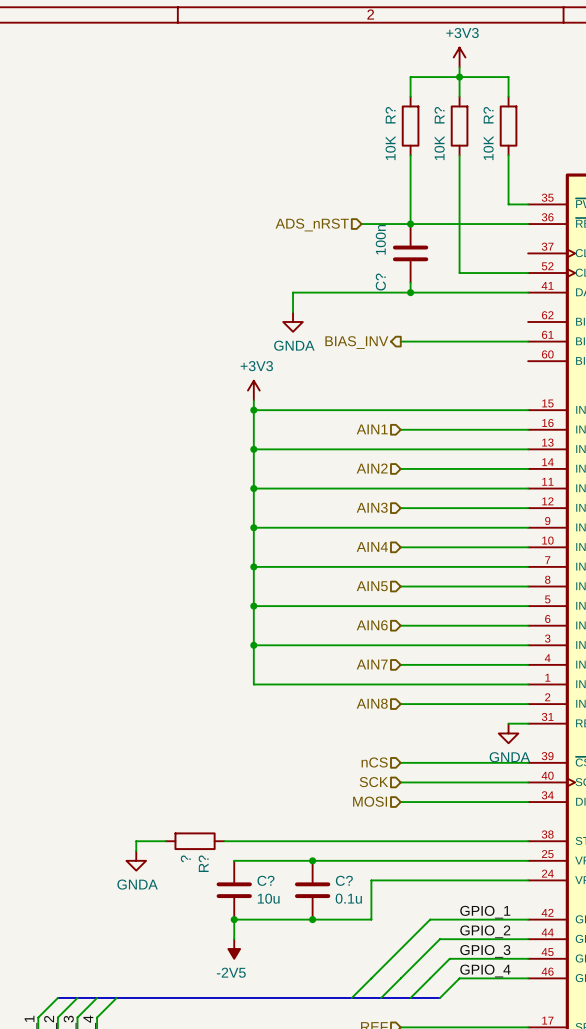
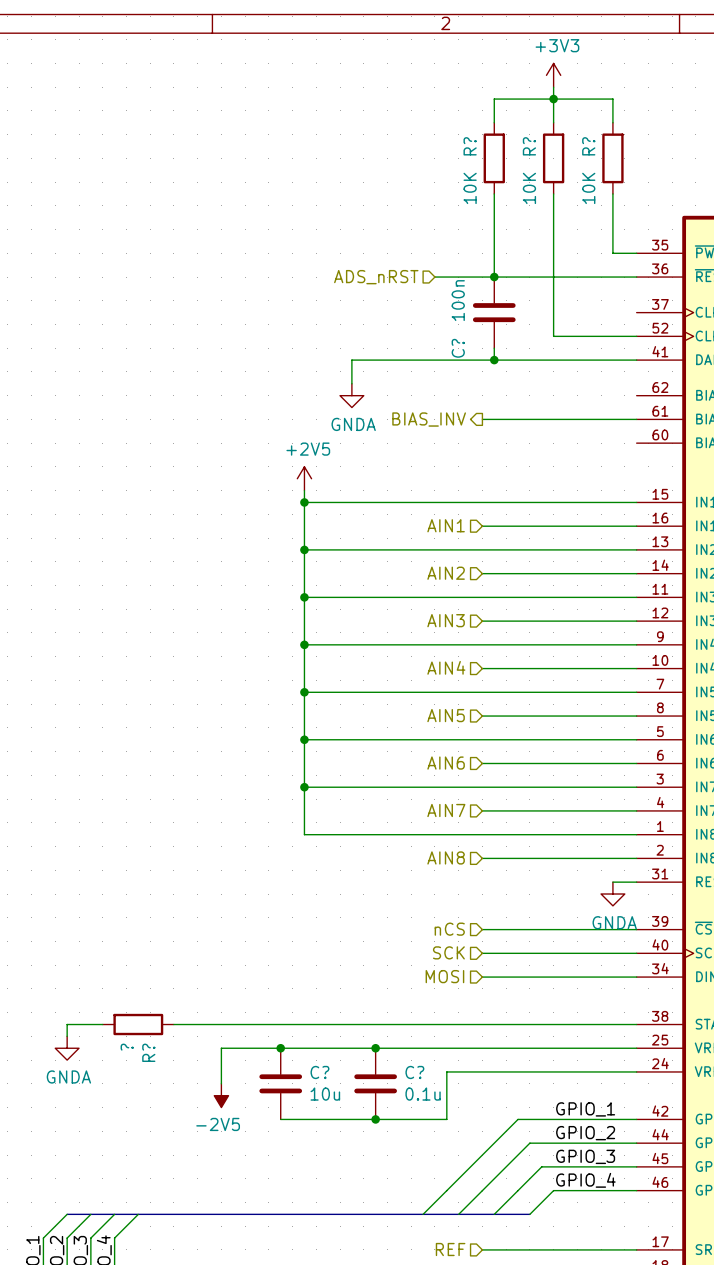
power symbol: +3V3 (253, 390) -> +2V5 (304, 478)
wire: none -> (102, 1024) (67, 1024) (67, 1036)
wire: none -> (197, 1024) (268, 1024)
R? position: (195, 841) -> (138, 1024)
power symbol position: GNDA (136, 860) -> GNDA (67, 1048)
wire: none -> (280, 1048) (221, 1048) (221, 1083)
junction: none -> (280, 1048)
wire: (234, 919) (234, 939) -> none
junction: (234, 919) -> none
power symbol position: -2V5 (234, 949) -> -2V5 (221, 1095)

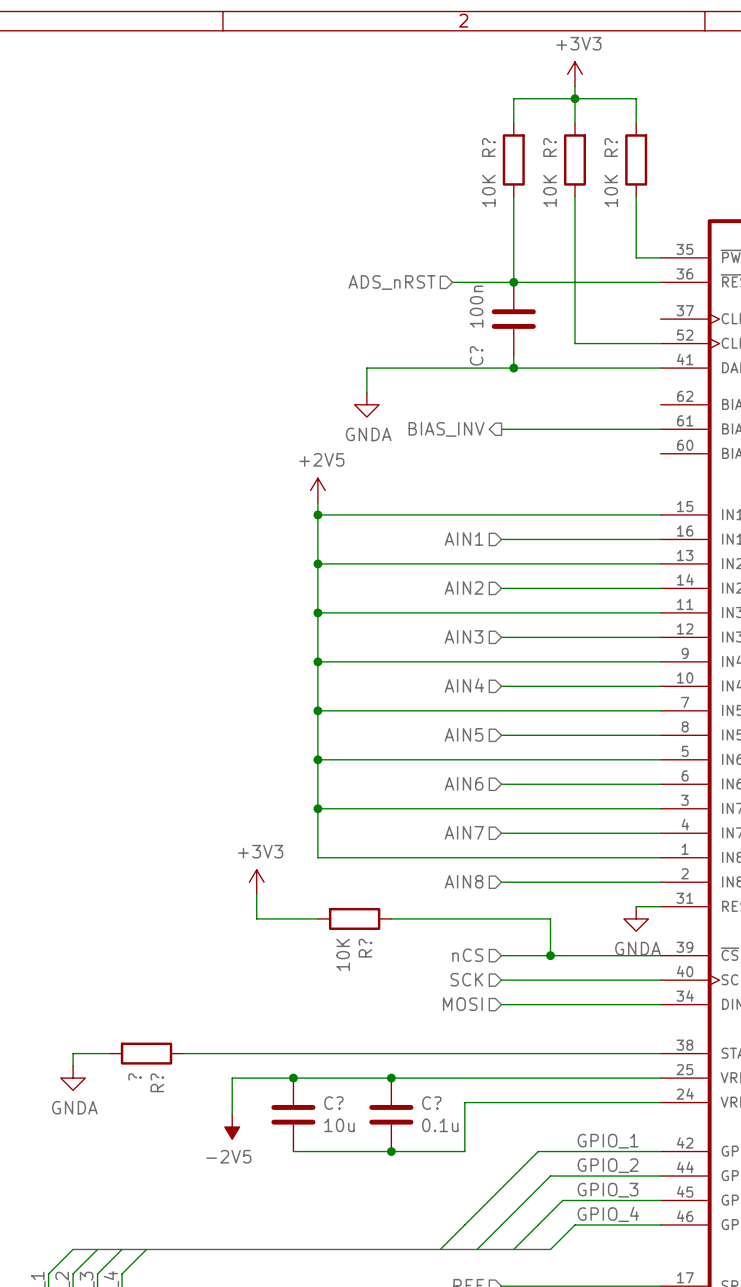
power symbol: none -> +3V3 (256, 882)
wire: none -> (256, 894) (256, 918) (317, 918)
R?: none -> 10K (354, 918)
wire: none -> (391, 918) (550, 918) (550, 955)
junction: none -> (550, 955)

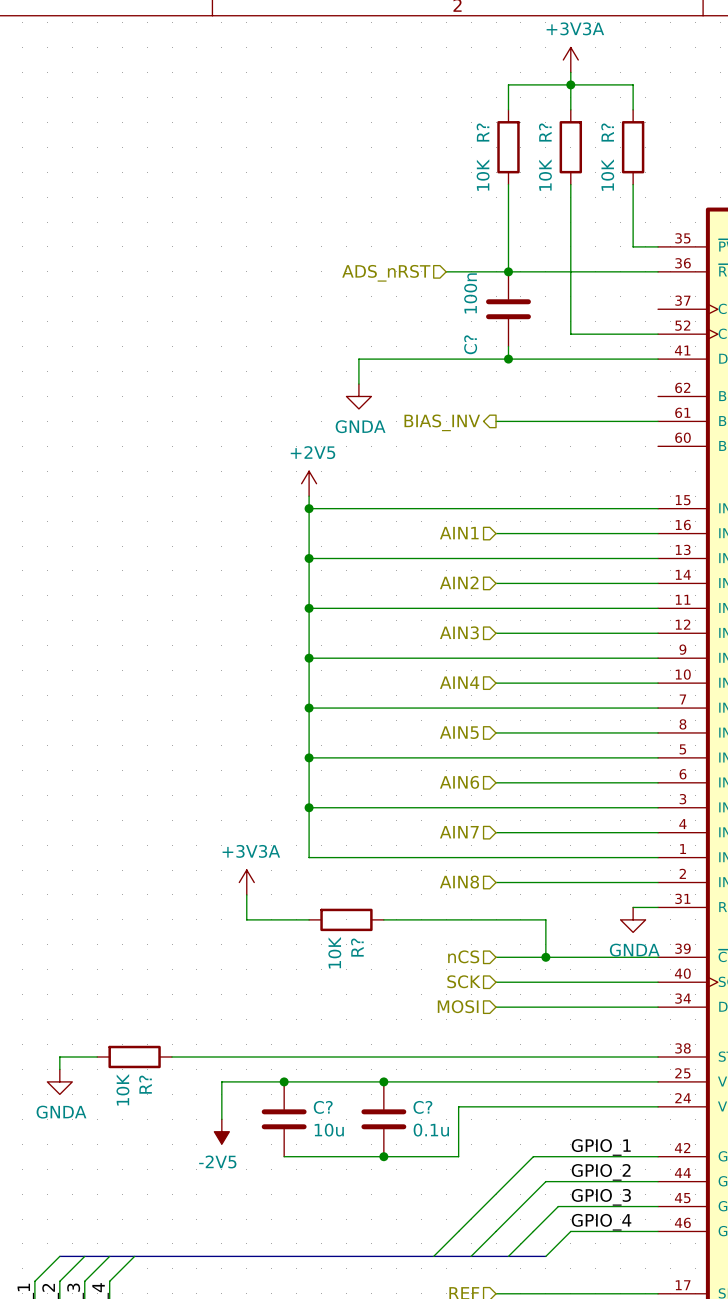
power symbol: +3V3 (574, 74) -> +3V3A (570, 59)
power symbol: +3V3 (256, 882) -> +3V3A (246, 882)
R? value: ? (135, 1076) -> 10K (122, 1089)

